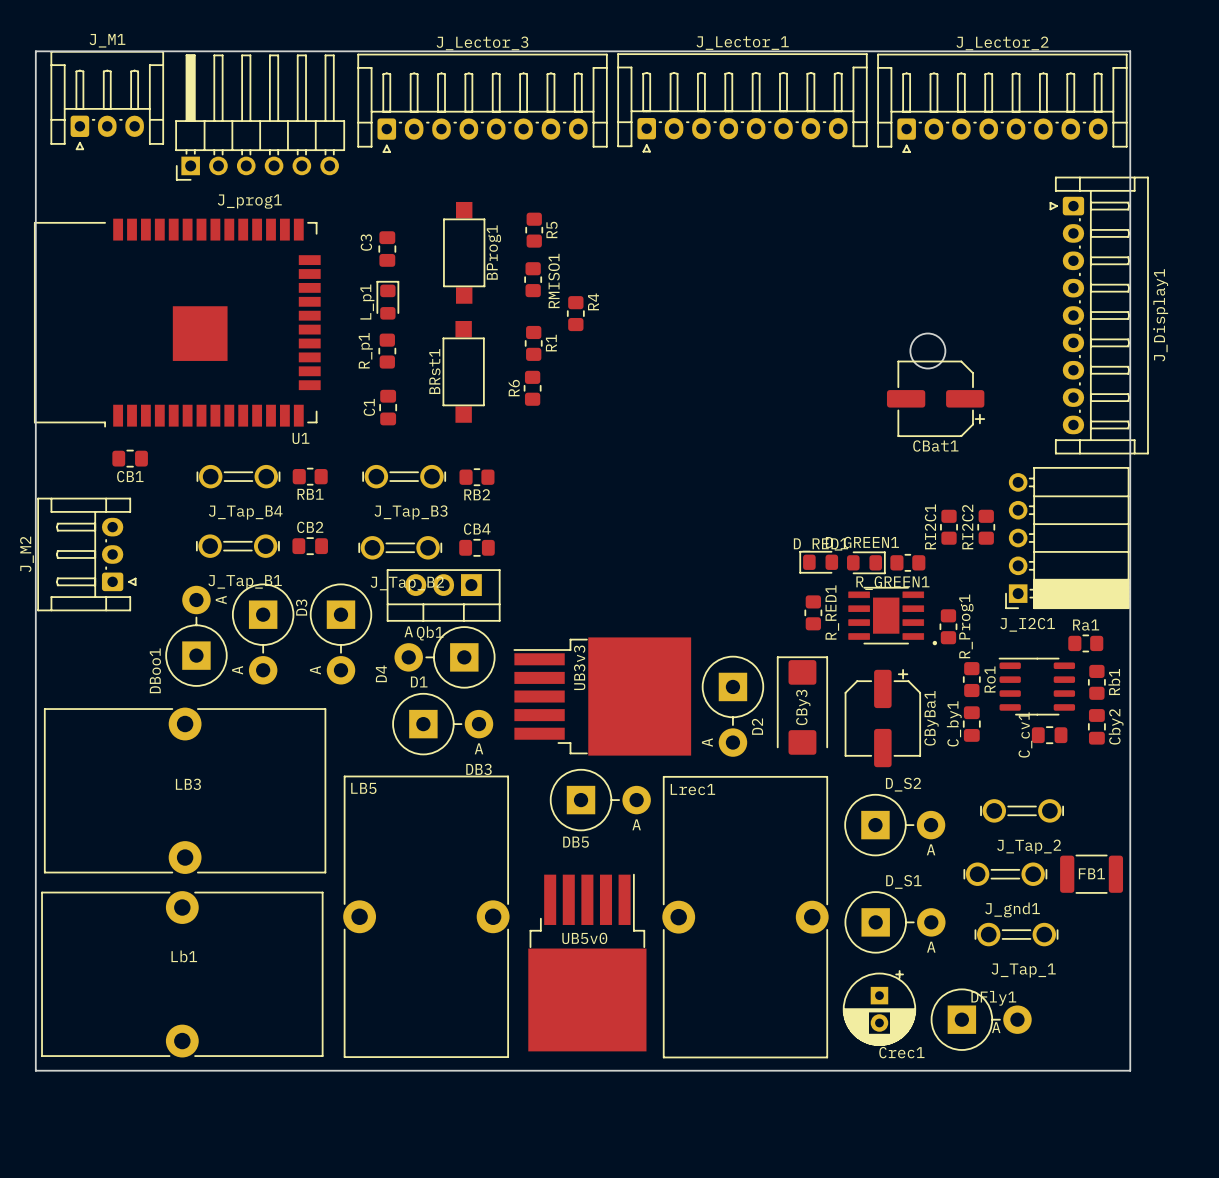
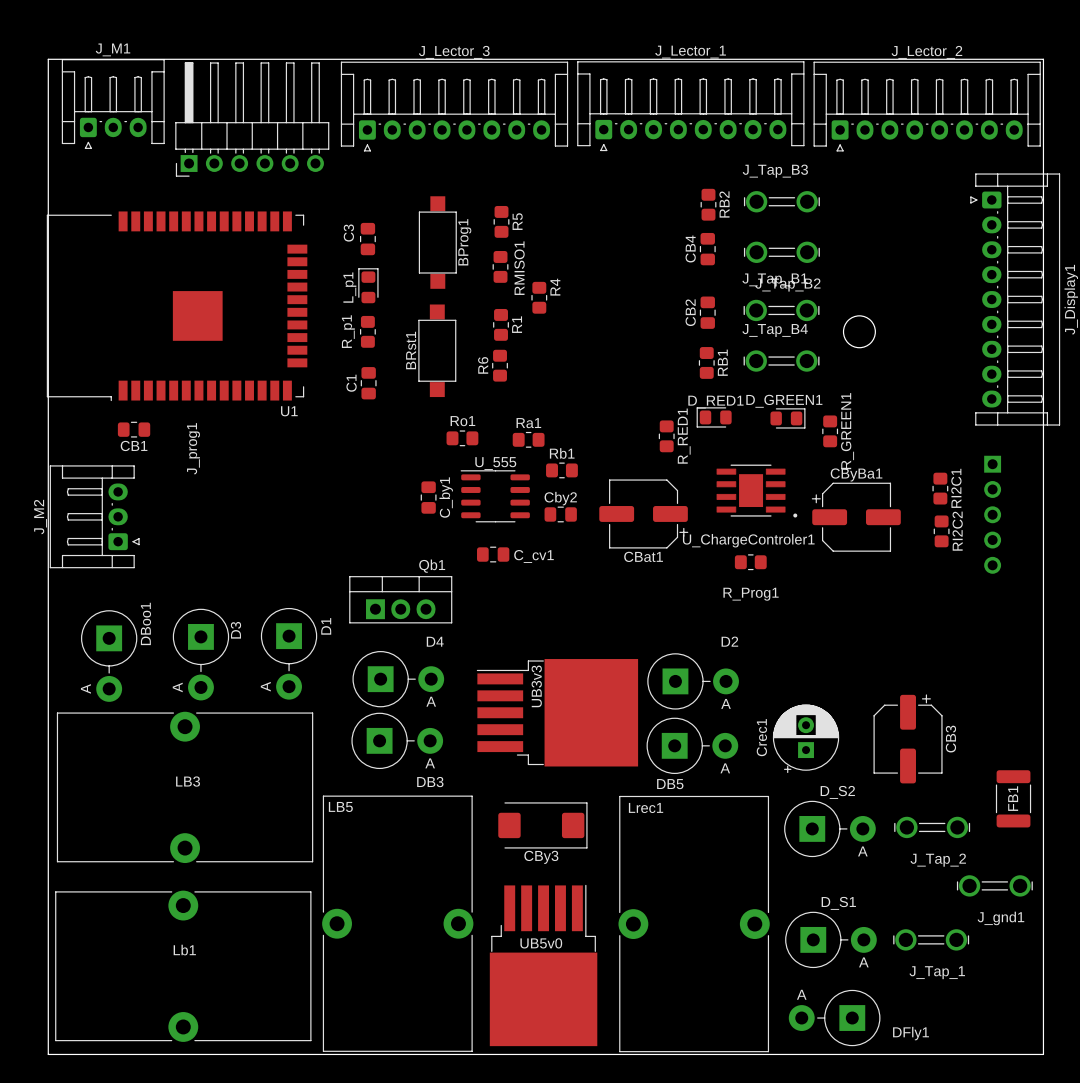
J_prog1 name rotation: 0° (249, 201) -> 90° counterclockwise (193, 448)
J_prog1 name position: J_prog1 (249, 201) -> J_prog1 (193, 448)
CBat1 footprint: [886, 360, 985, 437] -> [599, 479, 689, 549]
J_Tap_B4 position: (238, 476) -> (781, 361)
RB1 rotation: 0° (310, 476) -> 90° clockwise (706, 362)
RB1 position: (310, 476) -> (706, 362)
J_Tap_B3 position: (404, 476) -> (781, 201)
RB2 rotation: 0° (476, 477) -> 90° clockwise (708, 204)
RB2 position: (476, 477) -> (708, 204)
RB1 name position: RB1 (310, 494) -> RB1 (722, 362)
RB2 name position: RB2 (477, 494) -> RB2 (724, 204)
J_Tap_B4 name position: J_Tap_B4 (245, 512) -> J_Tap_B4 (775, 330)
J_Tap_B3 name position: J_Tap_B3 (411, 512) -> J_Tap_B3 (775, 171)
U_ChargeControler1: none -> (756, 491)
RI2C1 name position: RI2C1 (930, 526) -> RI2C1 (956, 488)
CB2 name position: CB2 (310, 527) -> CB2 (690, 312)
RI2C1 position: (949, 527) -> (940, 488)
RI2C2 name position: RI2C2 (967, 527) -> RI2C2 (957, 531)
RI2C2 position: (986, 527) -> (941, 531)
CB4 name position: CB4 (477, 529) -> CB4 (690, 248)
U_555: none -> (495, 496)
J_I2C1 side: top (1067, 538) -> bottom (992, 514)
J_Tap_B1 position: (237, 546) -> (781, 310)
CB2 rotation: 0° (310, 546) -> 90° clockwise (707, 312)
CB2 position: (310, 546) -> (707, 312)
J_Tap_B2 position: (400, 547) -> (781, 252)
CB4 rotation: 0° (476, 547) -> 90° clockwise (707, 249)
CB4 position: (476, 547) -> (707, 249)
D_RED1 position: (818, 562) -> (714, 417)
D_GREEN1 position: (866, 562) -> (787, 418)
R_GREEN1 rotation: 0° (907, 562) -> 90° clockwise (830, 431)
R_GREEN1 position: (907, 562) -> (830, 431)
J_Tap_B1 name position: J_Tap_B1 (245, 582) -> J_Tap_B1 (774, 279)
R_GREEN1 name position: R_GREEN1 (892, 583) -> R_GREEN1 (847, 431)
Qb1 rotation: 0° (443, 595) -> 180° (400, 599)
R_RED1 position: (813, 612) -> (666, 436)
part: (892, 616) -> none
R_Prog1 rotation: 0° (948, 626) -> 90° clockwise (750, 562)
R_Prog1 position: (948, 626) -> (750, 562)
D3 position: (263, 634) -> (200, 654)
D4 rotation: 0° (340, 634) -> 90° counterclockwise (398, 679)
D4 position: (340, 634) -> (398, 679)
DBoo1 rotation: 0° (196, 636) -> 180° (109, 656)
DBoo1 position: (196, 636) -> (109, 656)
Ra1 position: (1085, 643) -> (528, 439)
D1 rotation: 0° (444, 657) -> 90° counterclockwise (289, 653)
D1 position: (444, 657) -> (289, 653)
CByBa1 footprint: [844, 669, 921, 768] -> [811, 482, 901, 552]
Ro1 rotation: 0° (971, 679) -> 90° clockwise (462, 438)
Ro1 position: (971, 679) -> (462, 438)
Ro1 name position: Ro1 (990, 679) -> Ro1 (462, 421)
D1 name position: D1 (419, 682) -> D1 (326, 626)
Rb1 rotation: 0° (1096, 682) -> 90° clockwise (561, 470)
Rb1 position: (1096, 682) -> (561, 470)
Rb1 name position: Rb1 (1114, 682) -> Rb1 (562, 453)
part: (1036, 686) -> none
UB3v3 position: (602, 696) -> (557, 712)
CBy3 rotation: 0° (802, 705) -> 90° clockwise (542, 825)
CBy3 position: (802, 705) -> (542, 825)
D2 rotation: 0° (732, 706) -> 90° counterclockwise (693, 681)
CBy3 name position: CBy3 (803, 707) -> CBy3 (541, 857)
CByBa1 name position: CByBa1 (931, 718) -> CByBa1 (856, 474)
C_by1 name position: C_by1 (954, 723) -> C_by1 (446, 497)
DB3 position: (442, 724) -> (397, 740)
C_by1 position: (971, 724) -> (428, 497)
D2 name position: D2 (757, 726) -> D2 (729, 641)
Cby2 rotation: 0° (1096, 726) -> 90° clockwise (560, 514)
Cby2 position: (1096, 726) -> (560, 514)
Cby2 name position: Cby2 (1116, 726) -> Cby2 (560, 498)
C_cv1 name rotation: 0° (1025, 735) -> 90° clockwise (533, 556)
C_cv1 name position: C_cv1 (1025, 735) -> C_cv1 (533, 556)
C_cv1 position: (1049, 735) -> (493, 554)
LB3 position: (185, 790) -> (185, 787)
CB3: none -> (908, 738)
DB5 position: (600, 800) -> (692, 745)
J_Tap_2 position: (1022, 810) -> (932, 827)
D_S2 position: (894, 825) -> (829, 828)
J_gnd1 position: (1005, 874) -> (994, 885)
FB1 rotation: 0° (1091, 874) -> 90° clockwise (1013, 798)
LB5 position: (426, 916) -> (397, 923)
Lrec1 position: (745, 917) -> (694, 924)
D_S1 position: (895, 922) -> (830, 939)
J_Tap_1 position: (1016, 934) -> (931, 939)
UB5v0 position: (587, 962) -> (543, 965)
Lb1 position: (182, 974) -> (183, 966)
DFly1 footprint: [930, 988, 1032, 1051] -> [788, 989, 881, 1047]
DFly1 name position: DFly1 (993, 998) -> DFly1 (911, 1033)
Crec1 rotation: 0° (879, 1008) -> 180° (806, 738)
Crec1 position: (879, 1008) -> (806, 738)
Crec1 name position: Crec1 (901, 1052) -> Crec1 (761, 737)
board edge: (35, 1070) (1130, 1070) -> (48, 986) (48, 1054) (1043, 1054) (1043, 986)

